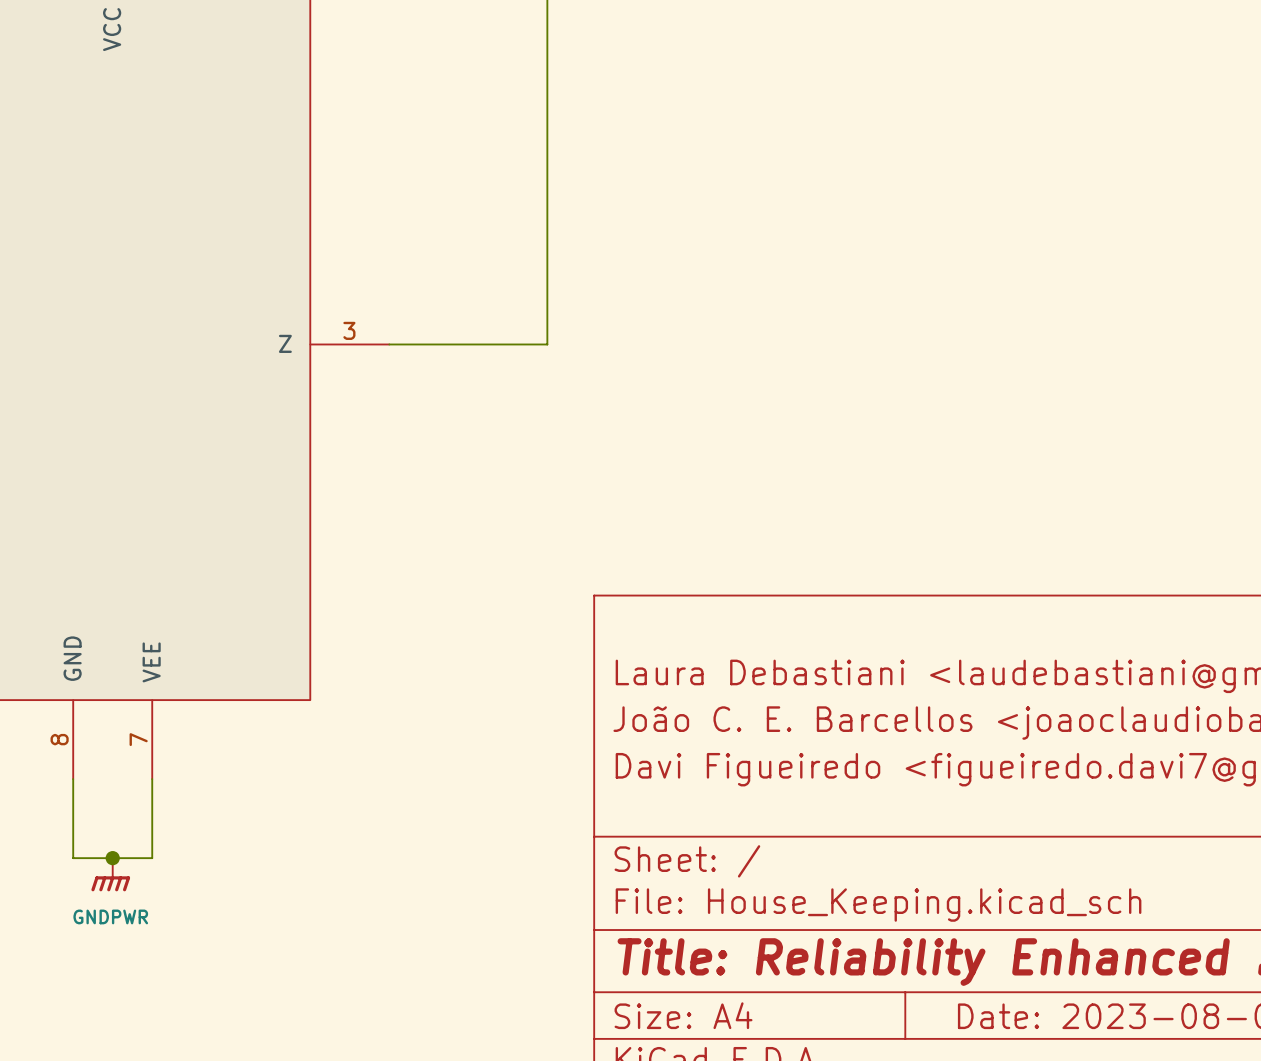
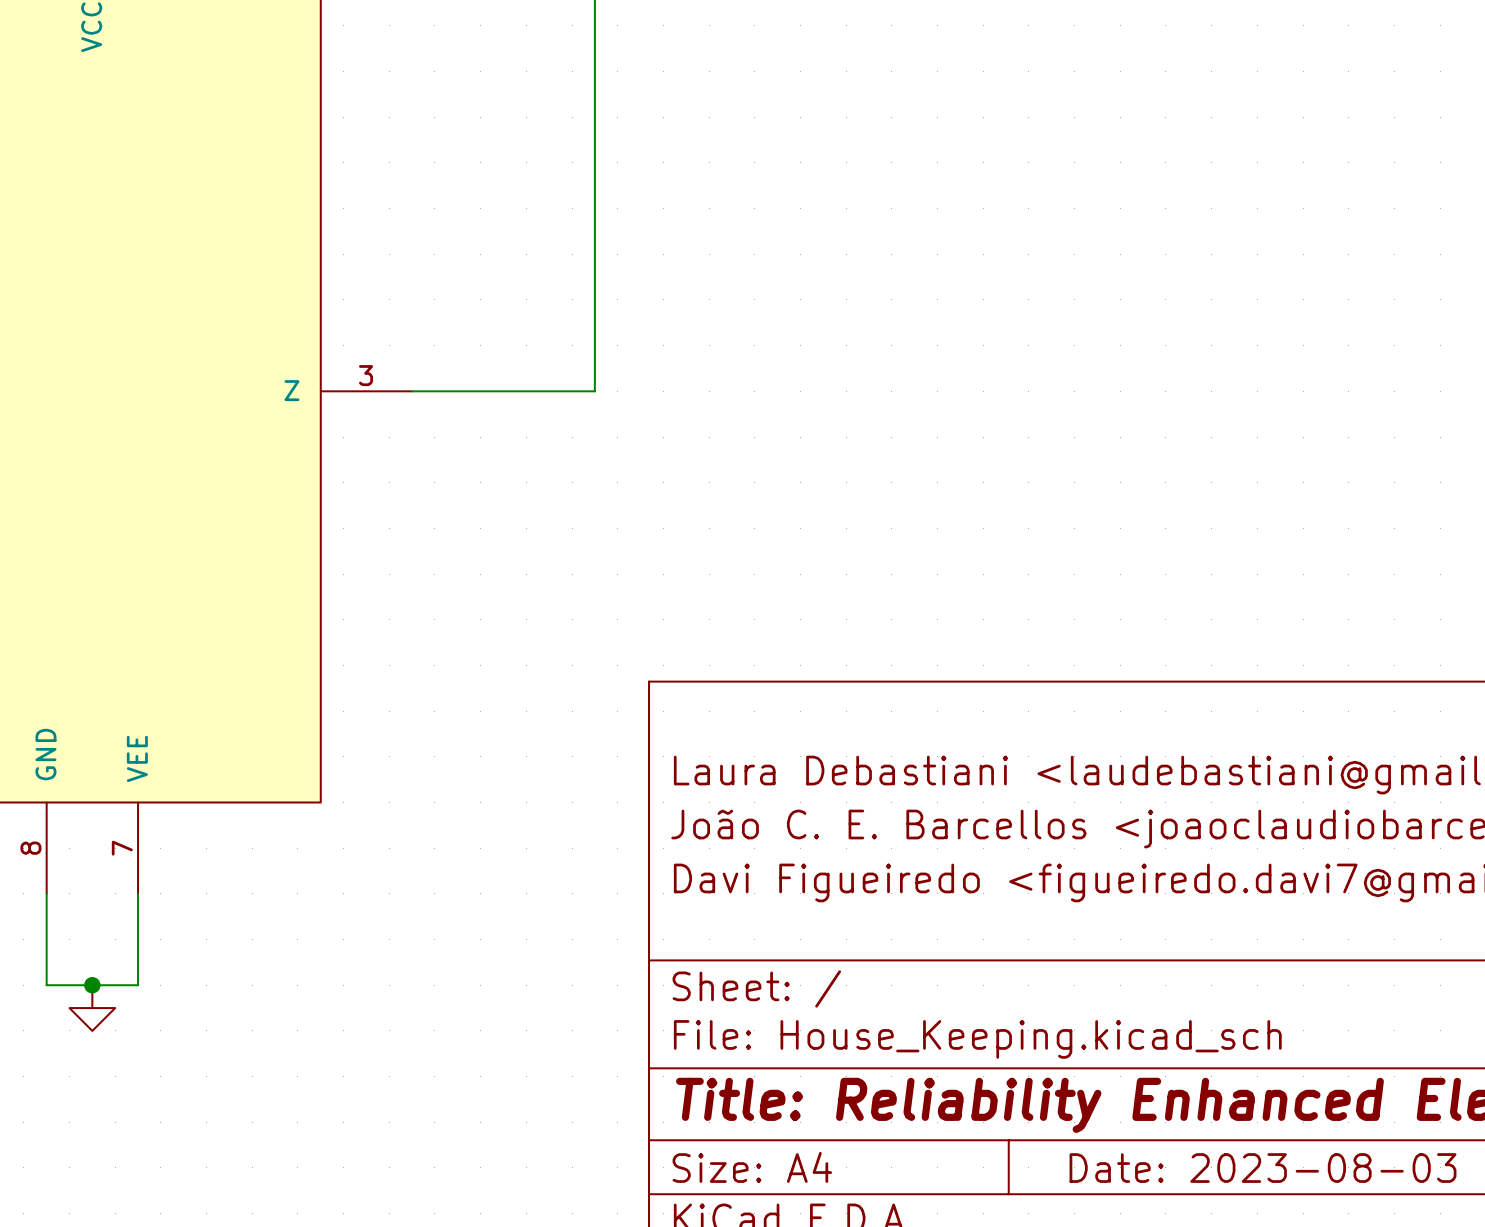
power symbol shape: [91, 858, 131, 892] -> [69, 985, 116, 1031]
power symbol text: GNDPWR (110, 916) -> none

